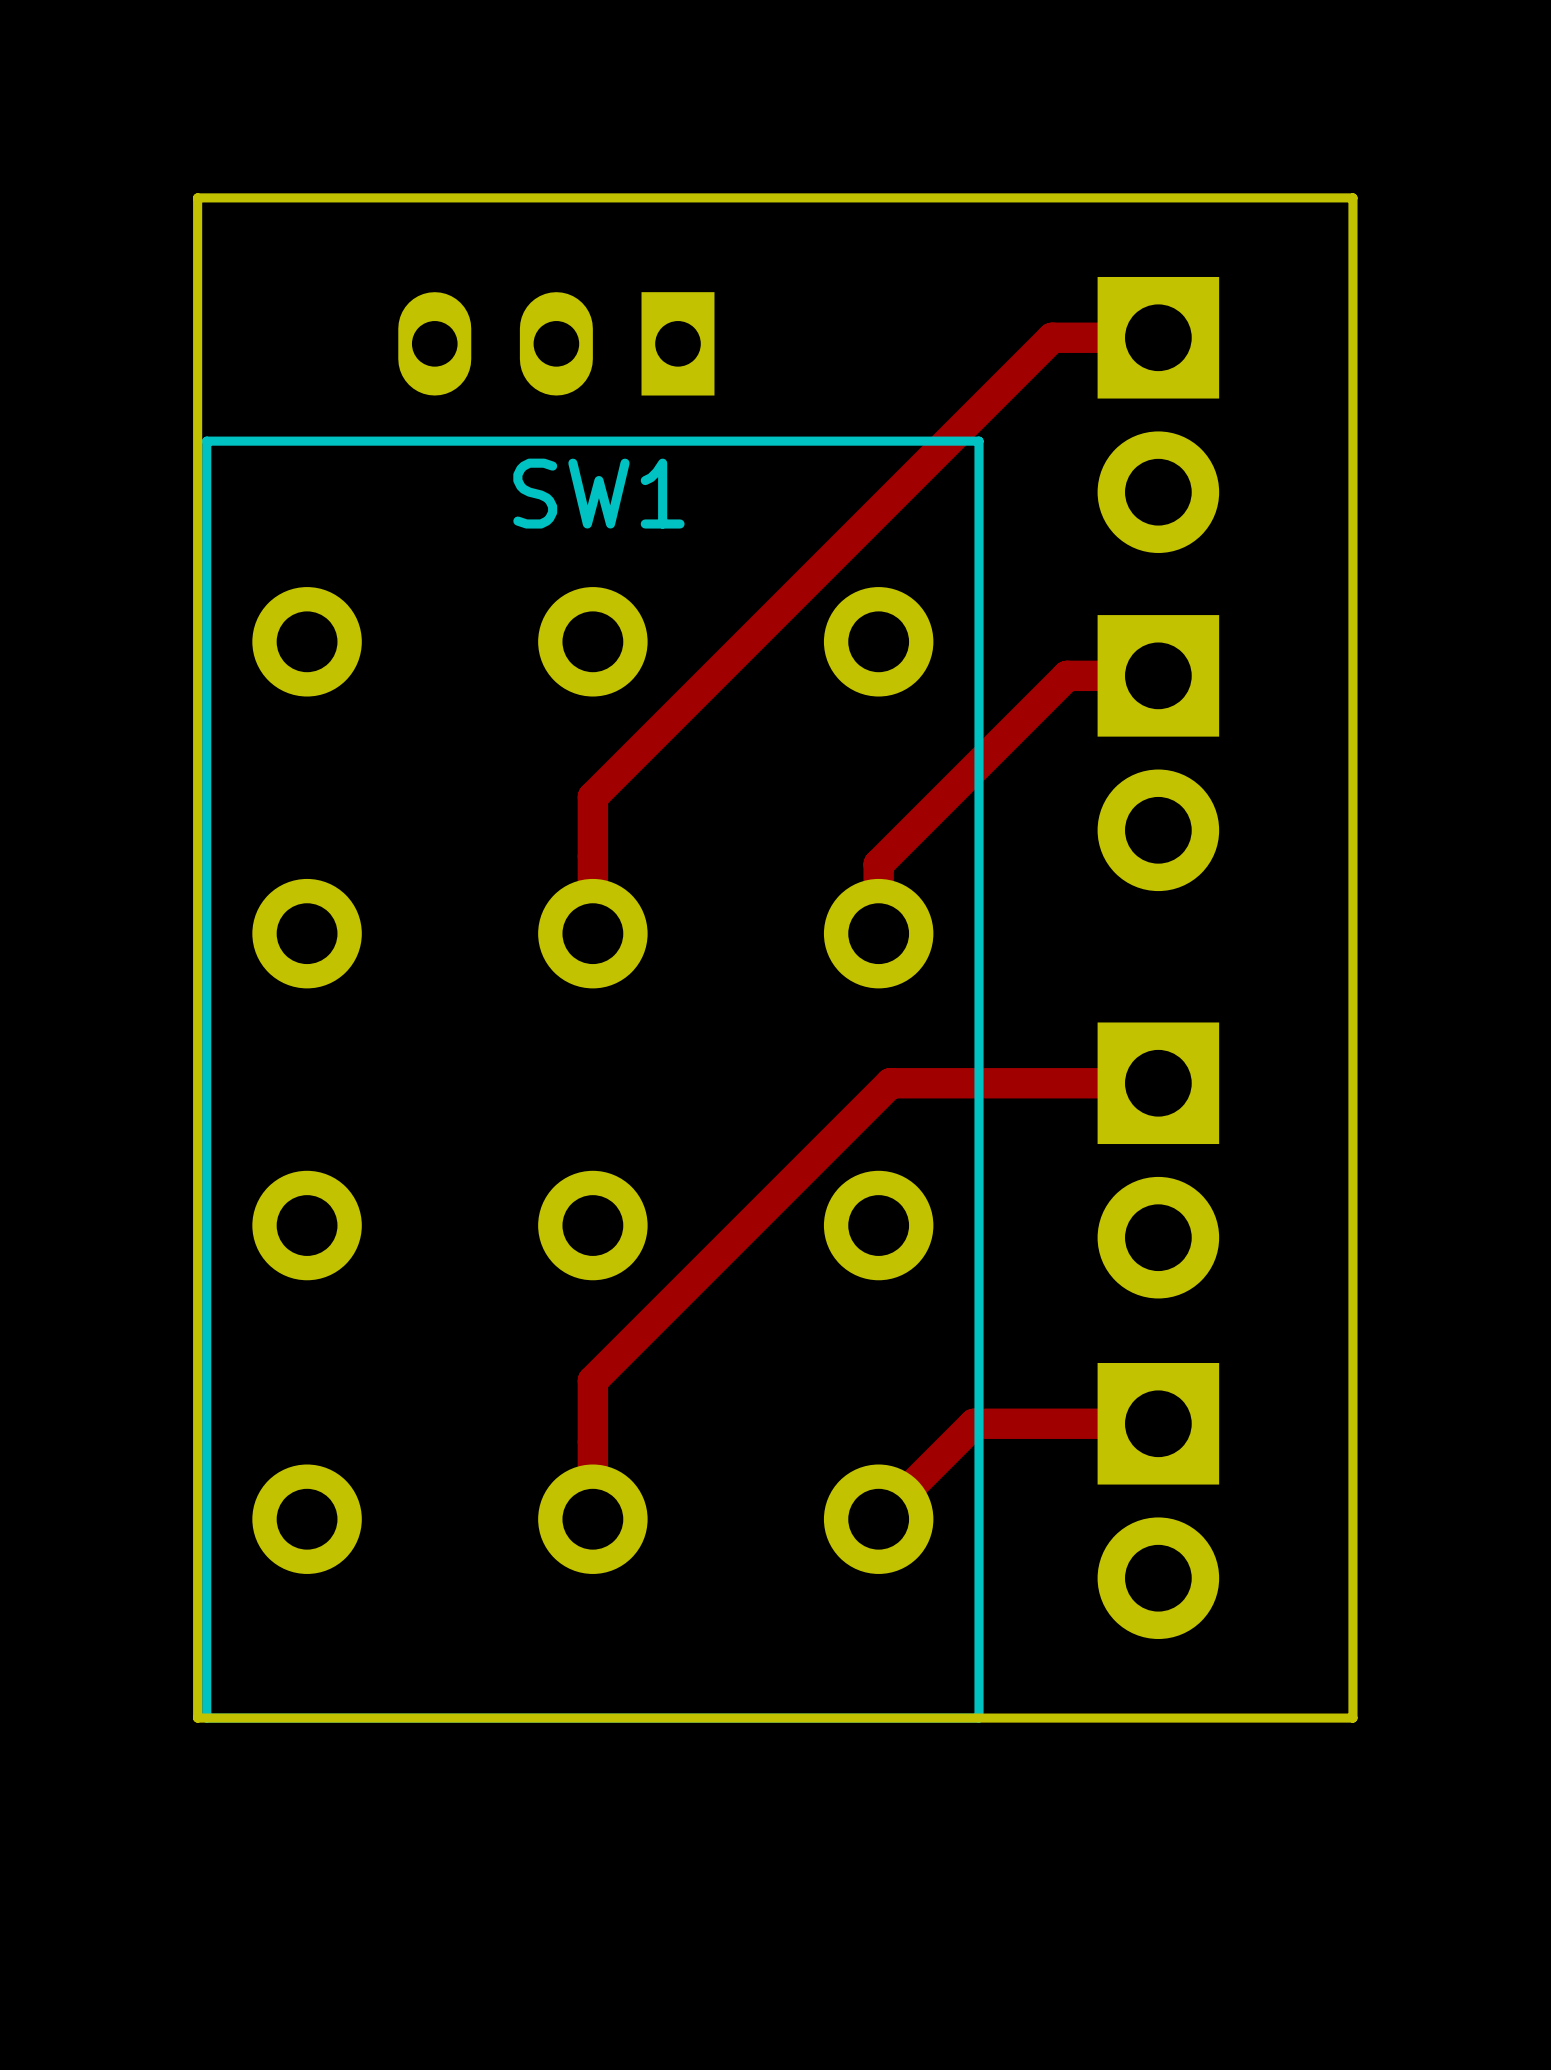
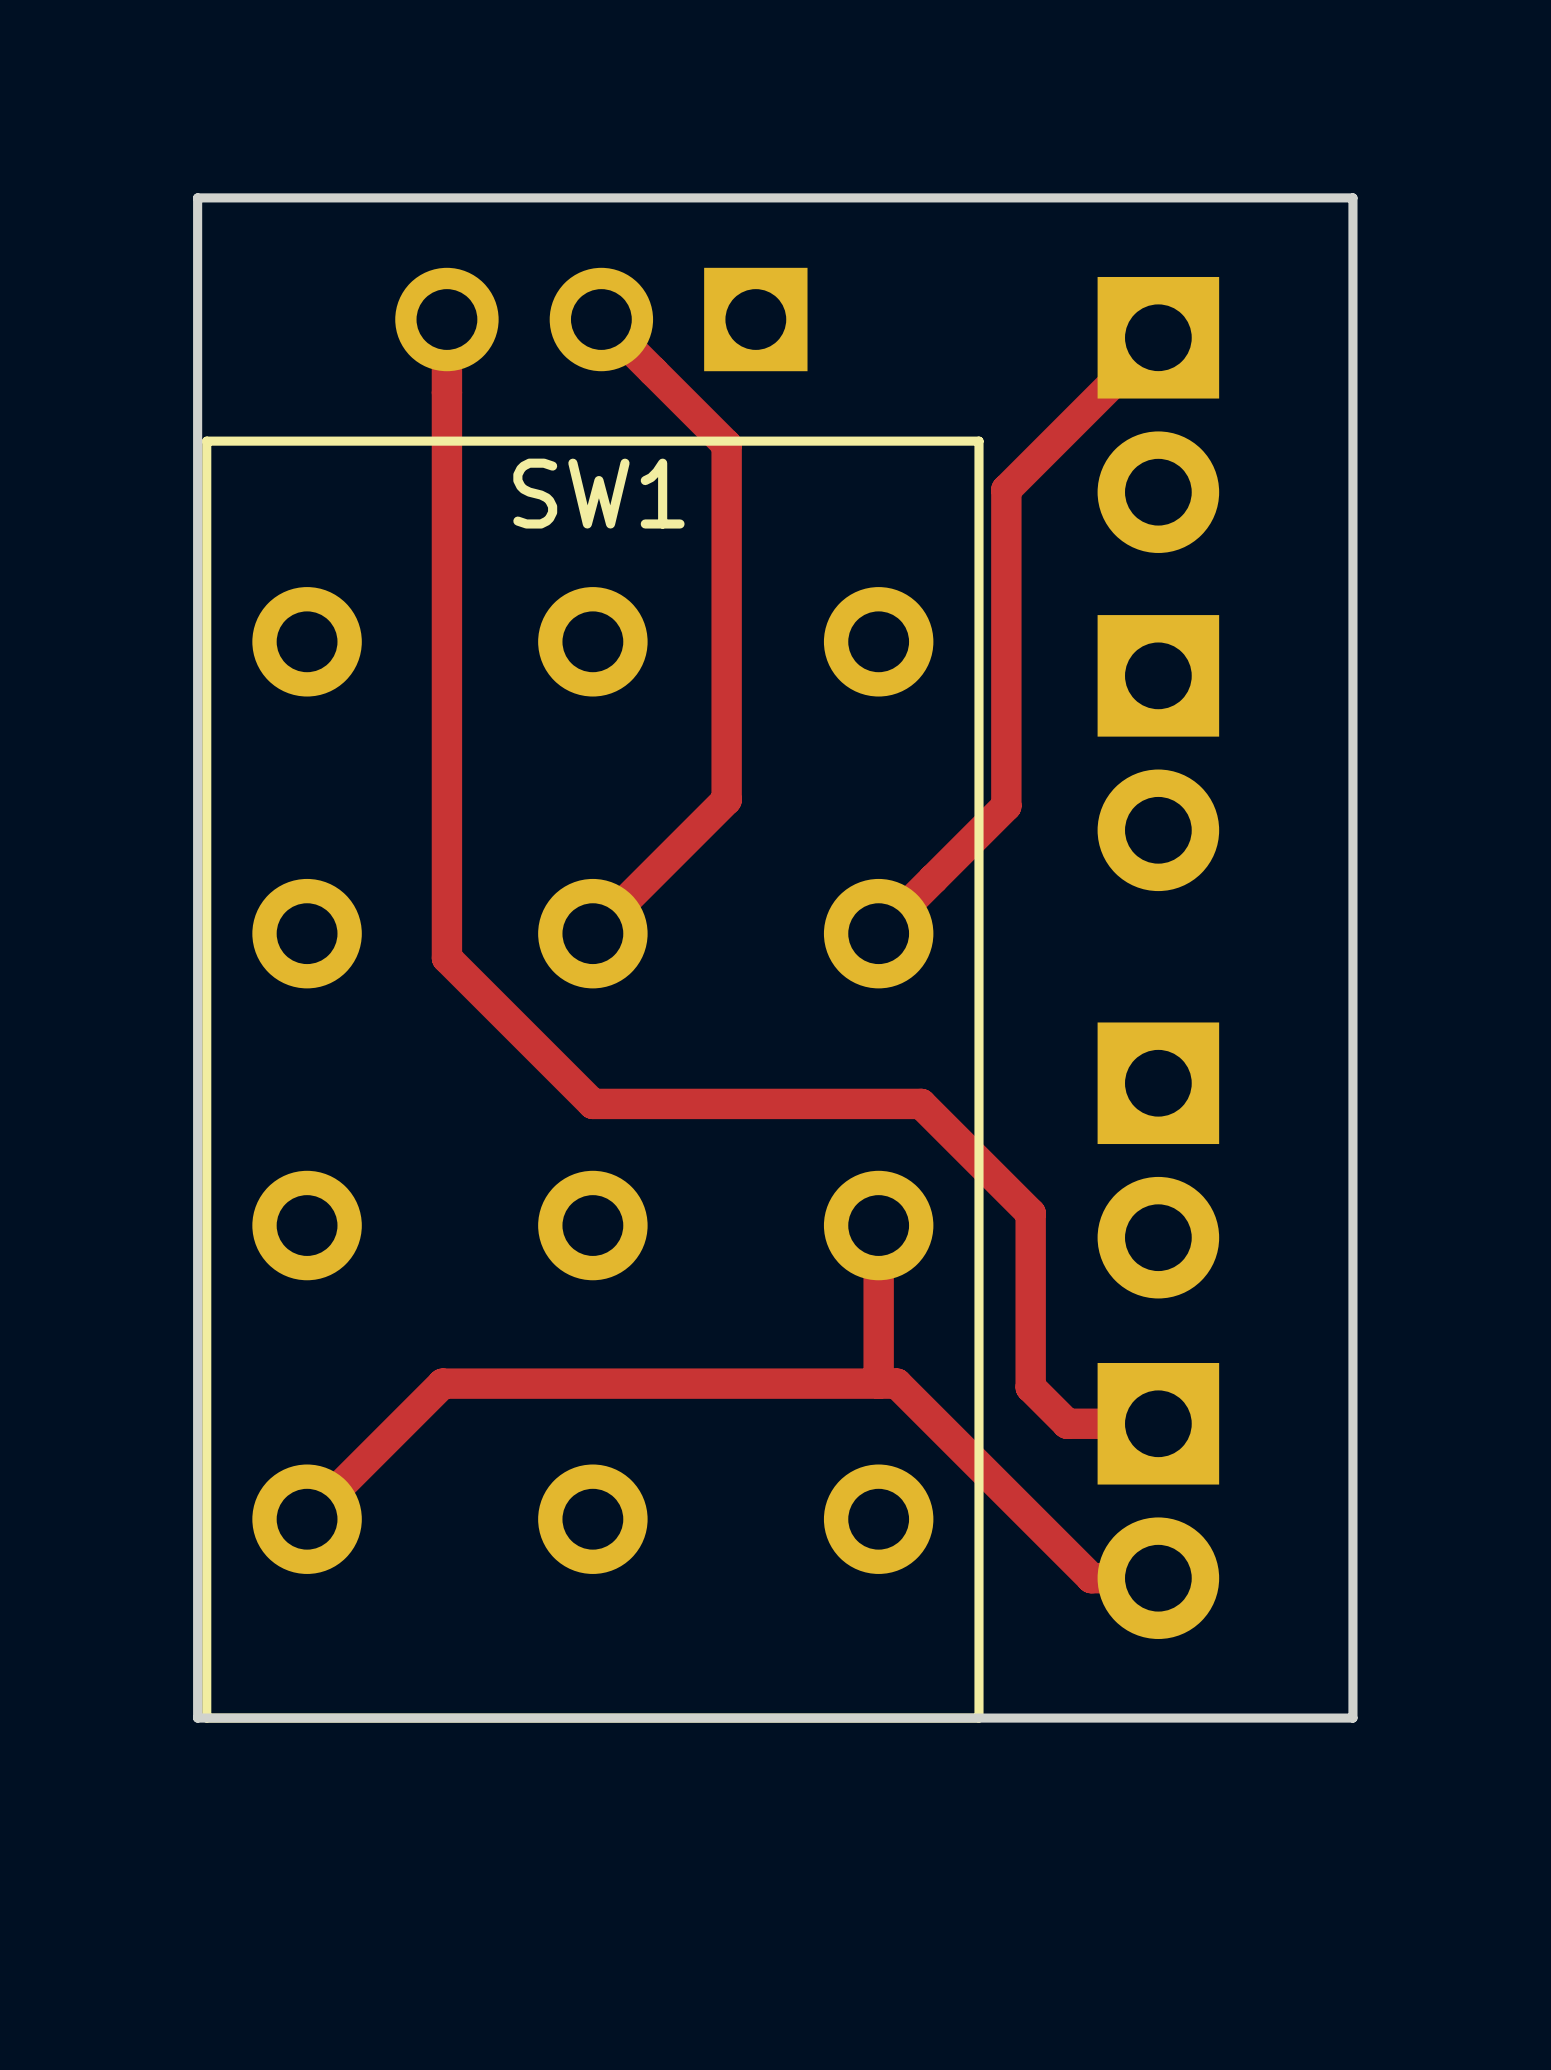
part footprint: [398, 292, 715, 396] -> [395, 267, 808, 372]
track: none -> (601, 319) (726, 444) (726, 799) (592, 933)
track: (1158, 337) (1052, 337) (592, 797) (592, 933) -> (1158, 337) (1006, 489) (1006, 805) (878, 933)
track: (1158, 675) (1067, 675) (878, 864) (878, 933) -> none
track: (1158, 1083) (890, 1083) (592, 1380) (592, 1519) -> none
track: none -> (878, 1225) (878, 1383)
track: (1067, 1423) (974, 1423) (878, 1519) -> (1067, 1423) (1030, 1387) (1030, 1213) (921, 1103) (592, 1103) (446, 957) (446, 319)
track: none -> (307, 1519) (442, 1383) (896, 1383) (1091, 1578) (1158, 1578)

